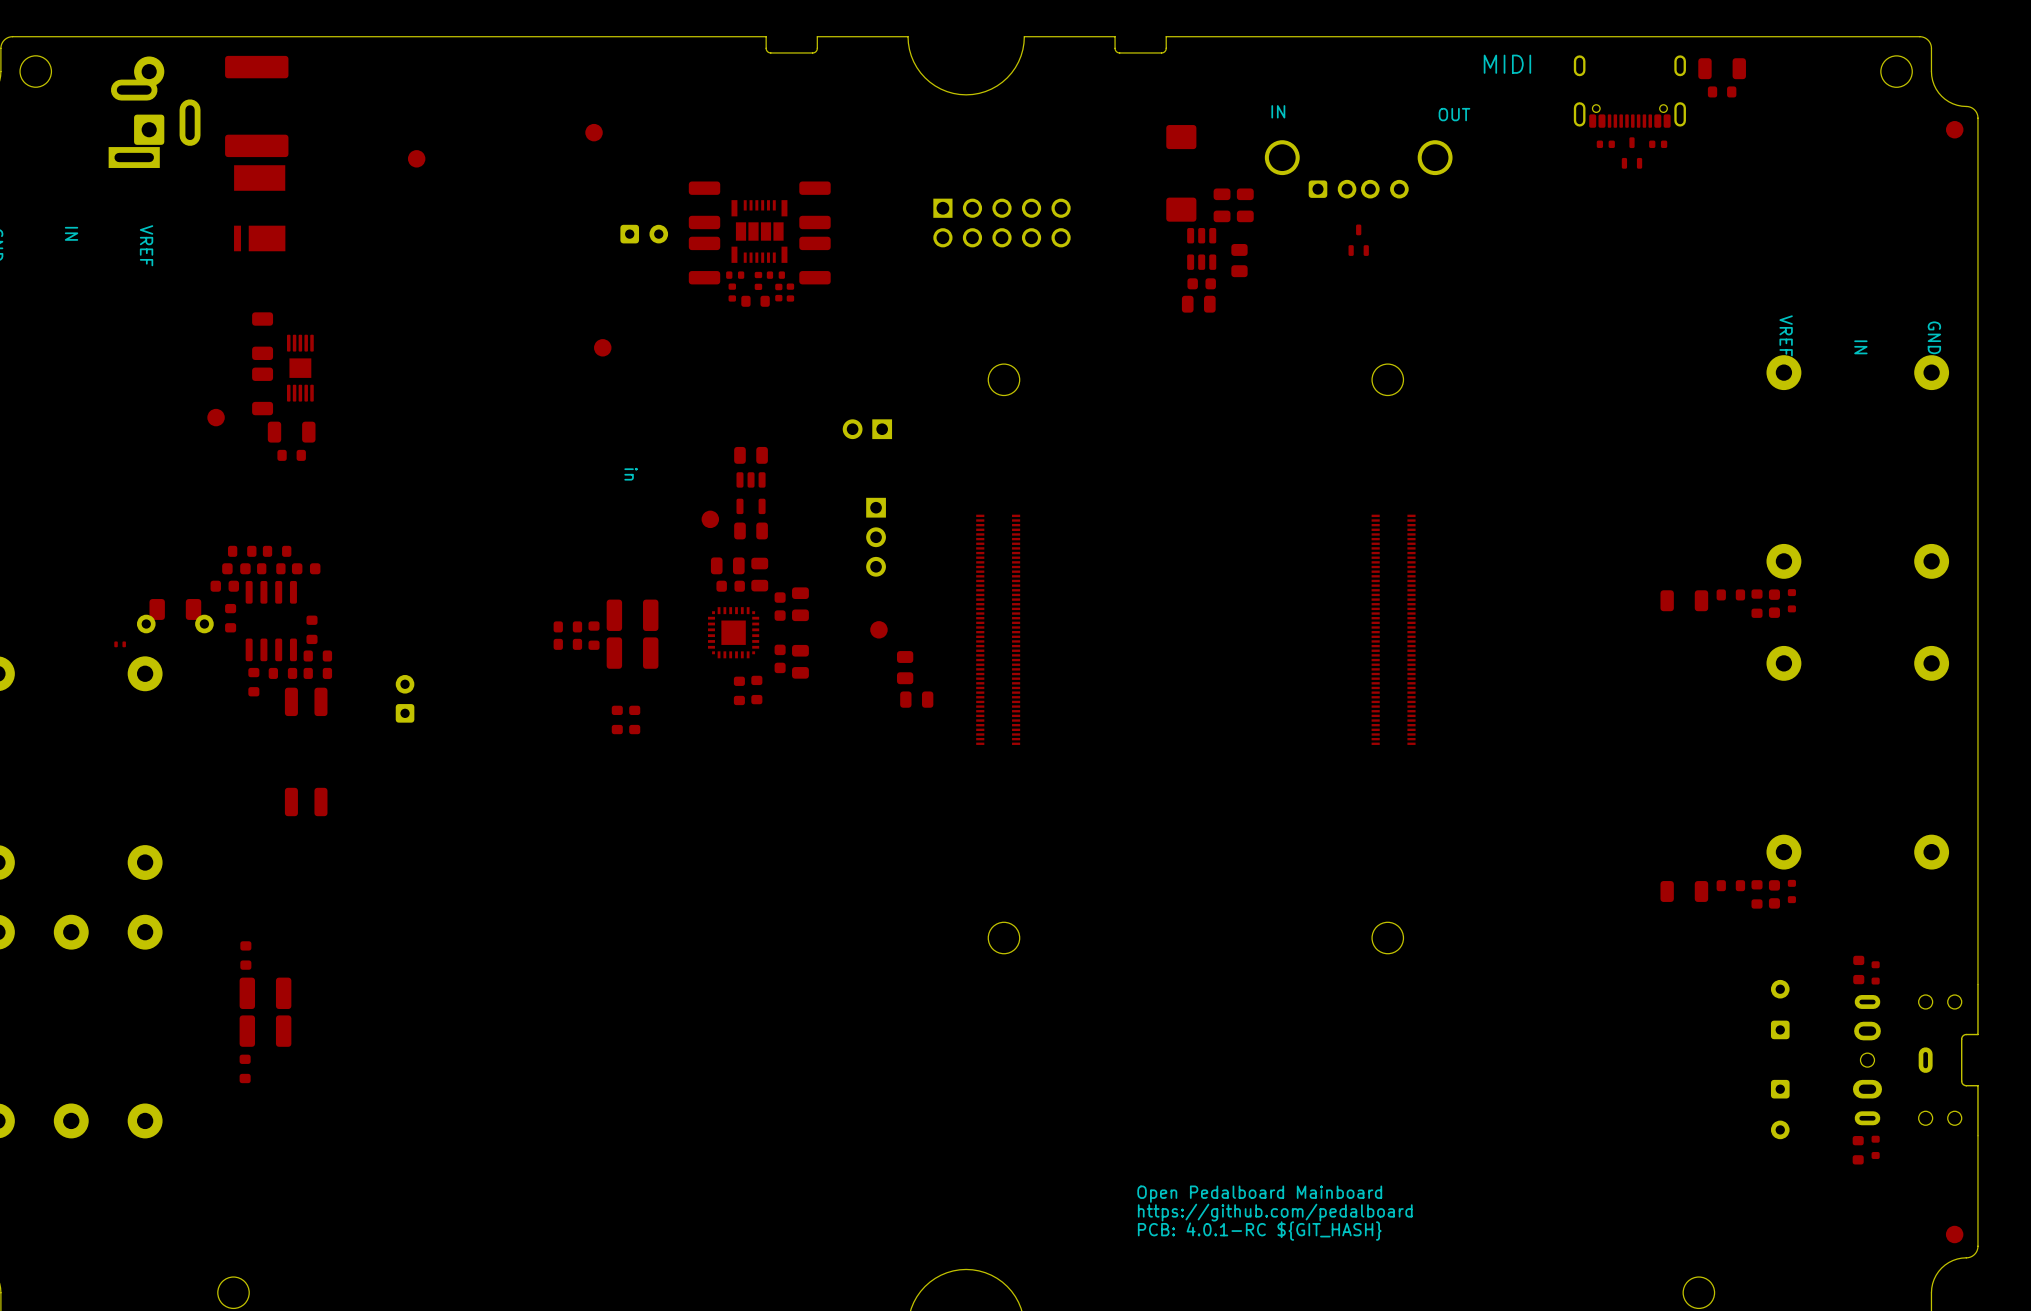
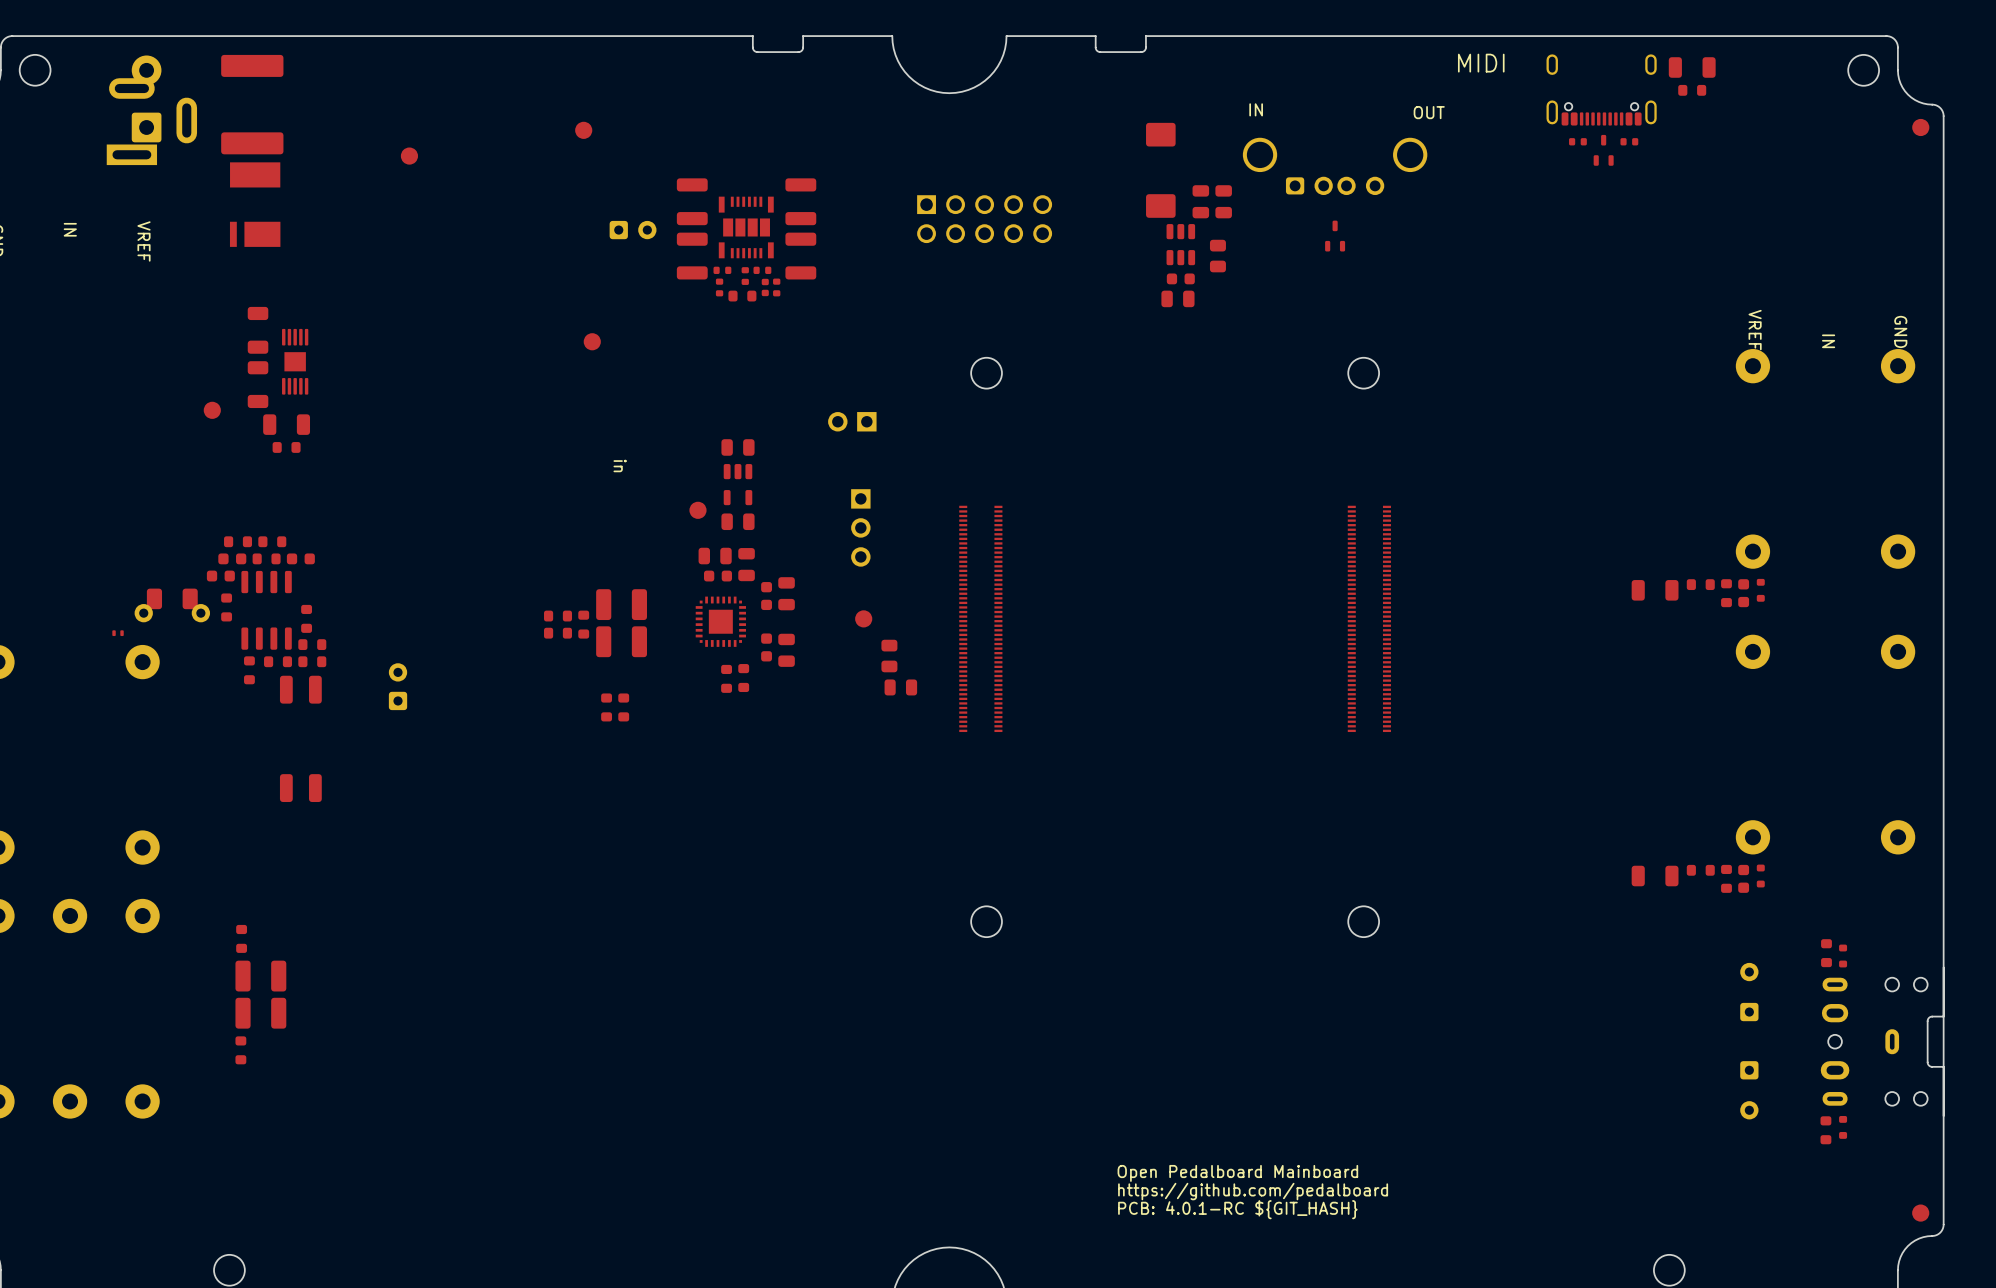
board edge: none -> (1943, 967) (1943, 1116)

